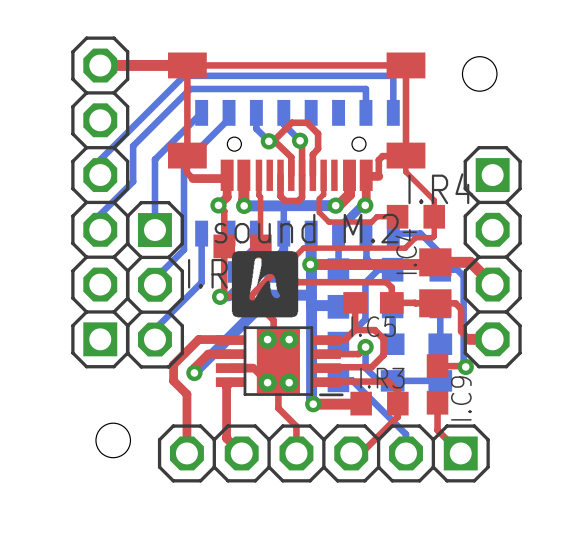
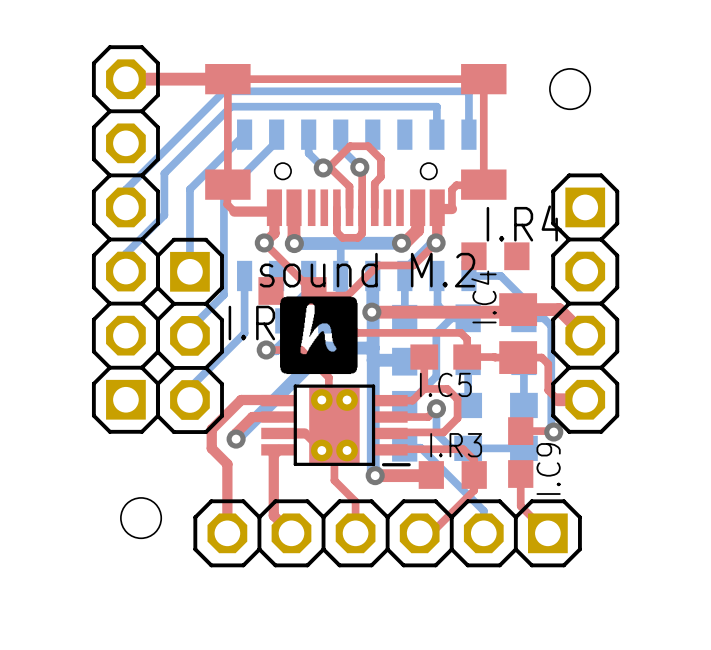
top track: (404, 156) (405, 171) (434, 200) (434, 236) (432, 237) (415, 237) (405, 248) (303, 248) (286, 264) (286, 272) (274, 272) (250, 296) -> none
top track: (258, 175) (260, 246) -> none
top track: (323, 175) (323, 194) (319, 198) (319, 212) (328, 222) (371, 222) (377, 216) (397, 216) -> none
top track: (224, 211) (224, 292) (220, 296) -> (271, 249) (317, 295) (347, 295) (377, 265) (413, 265) (436, 242)

